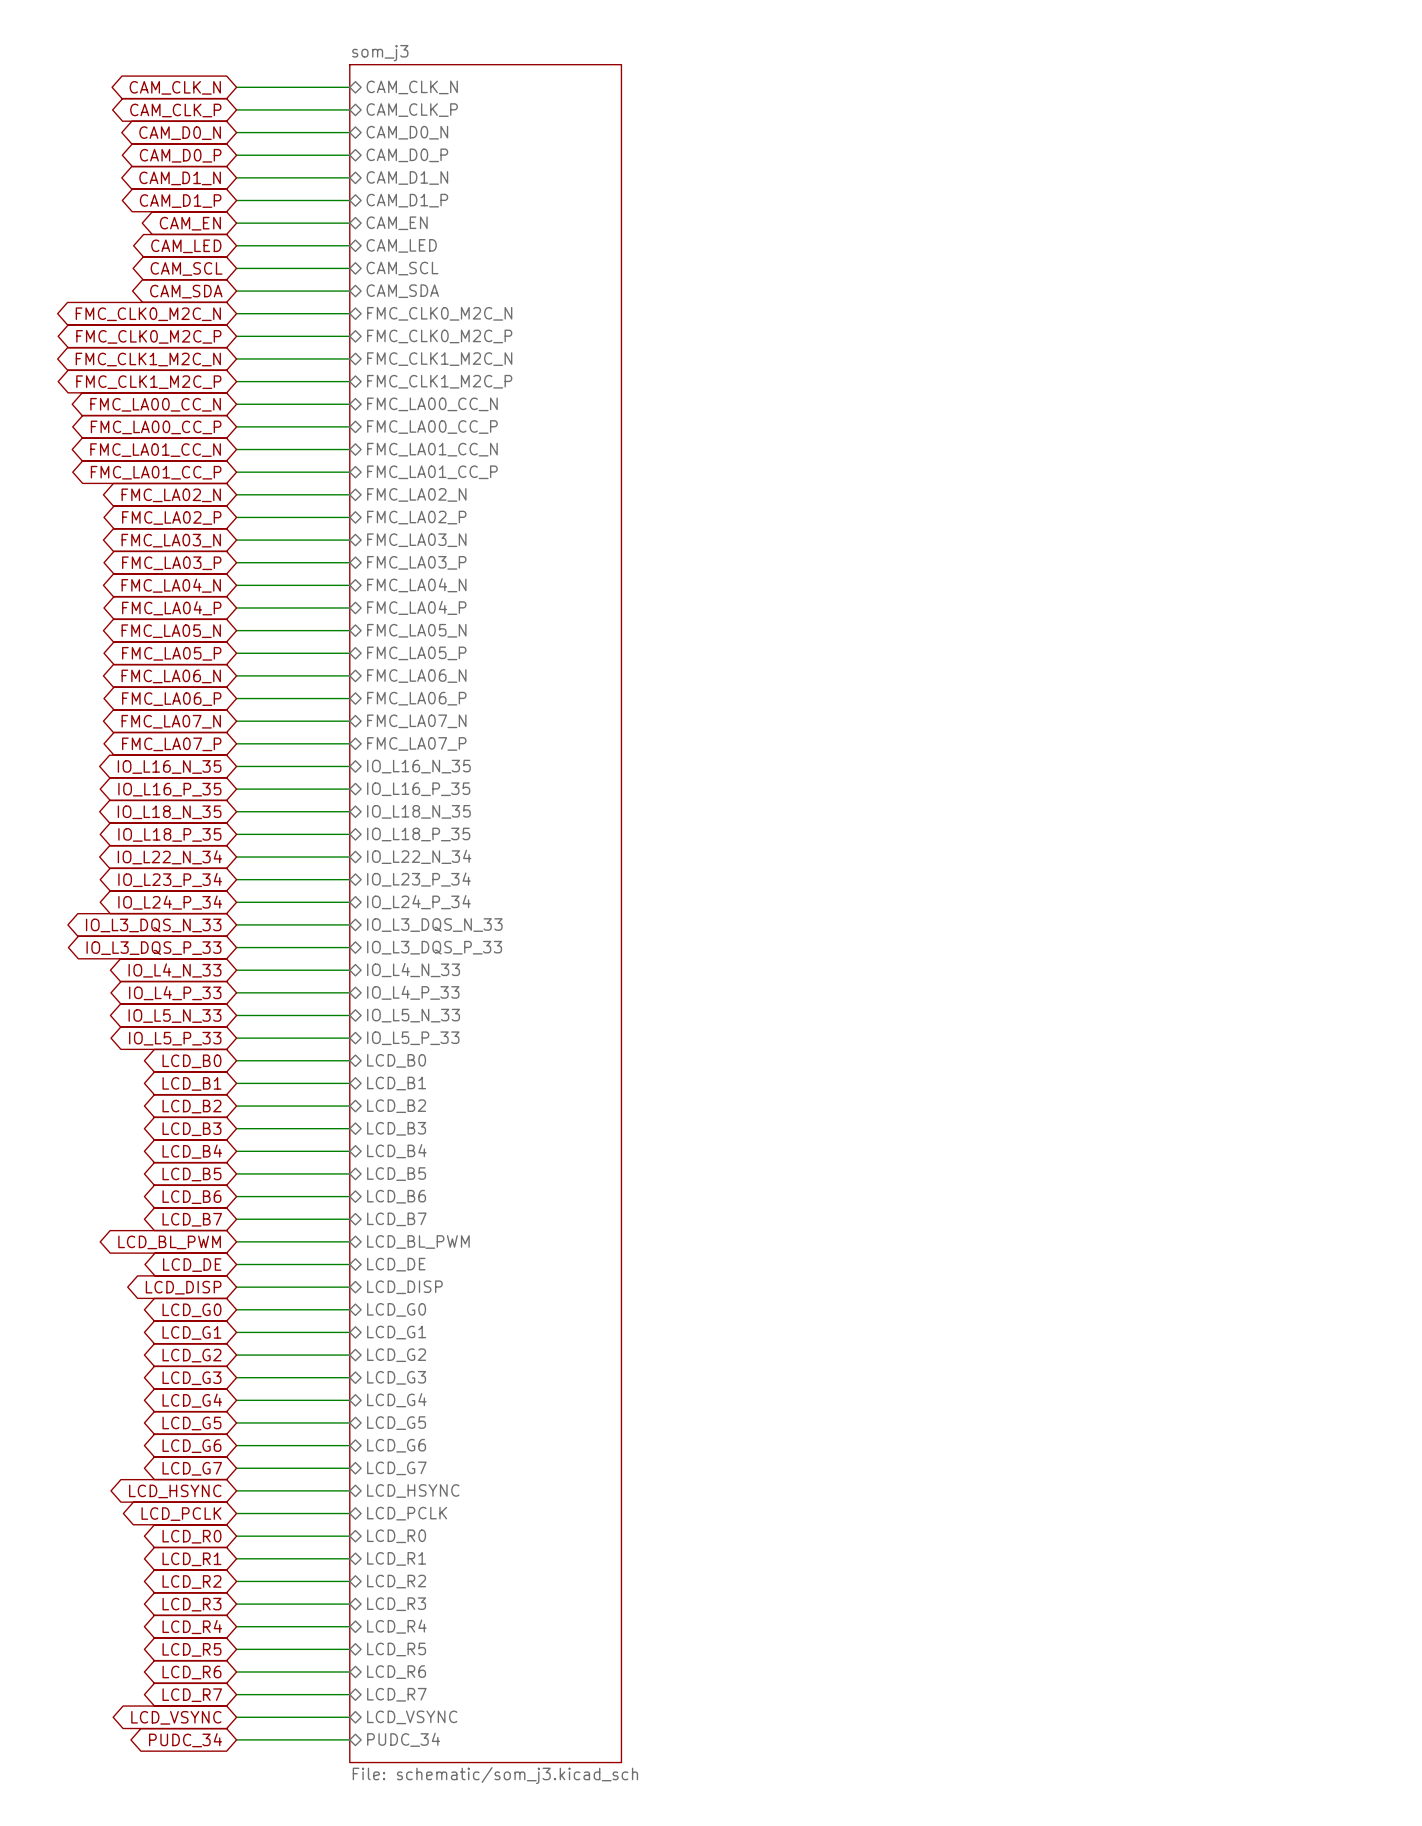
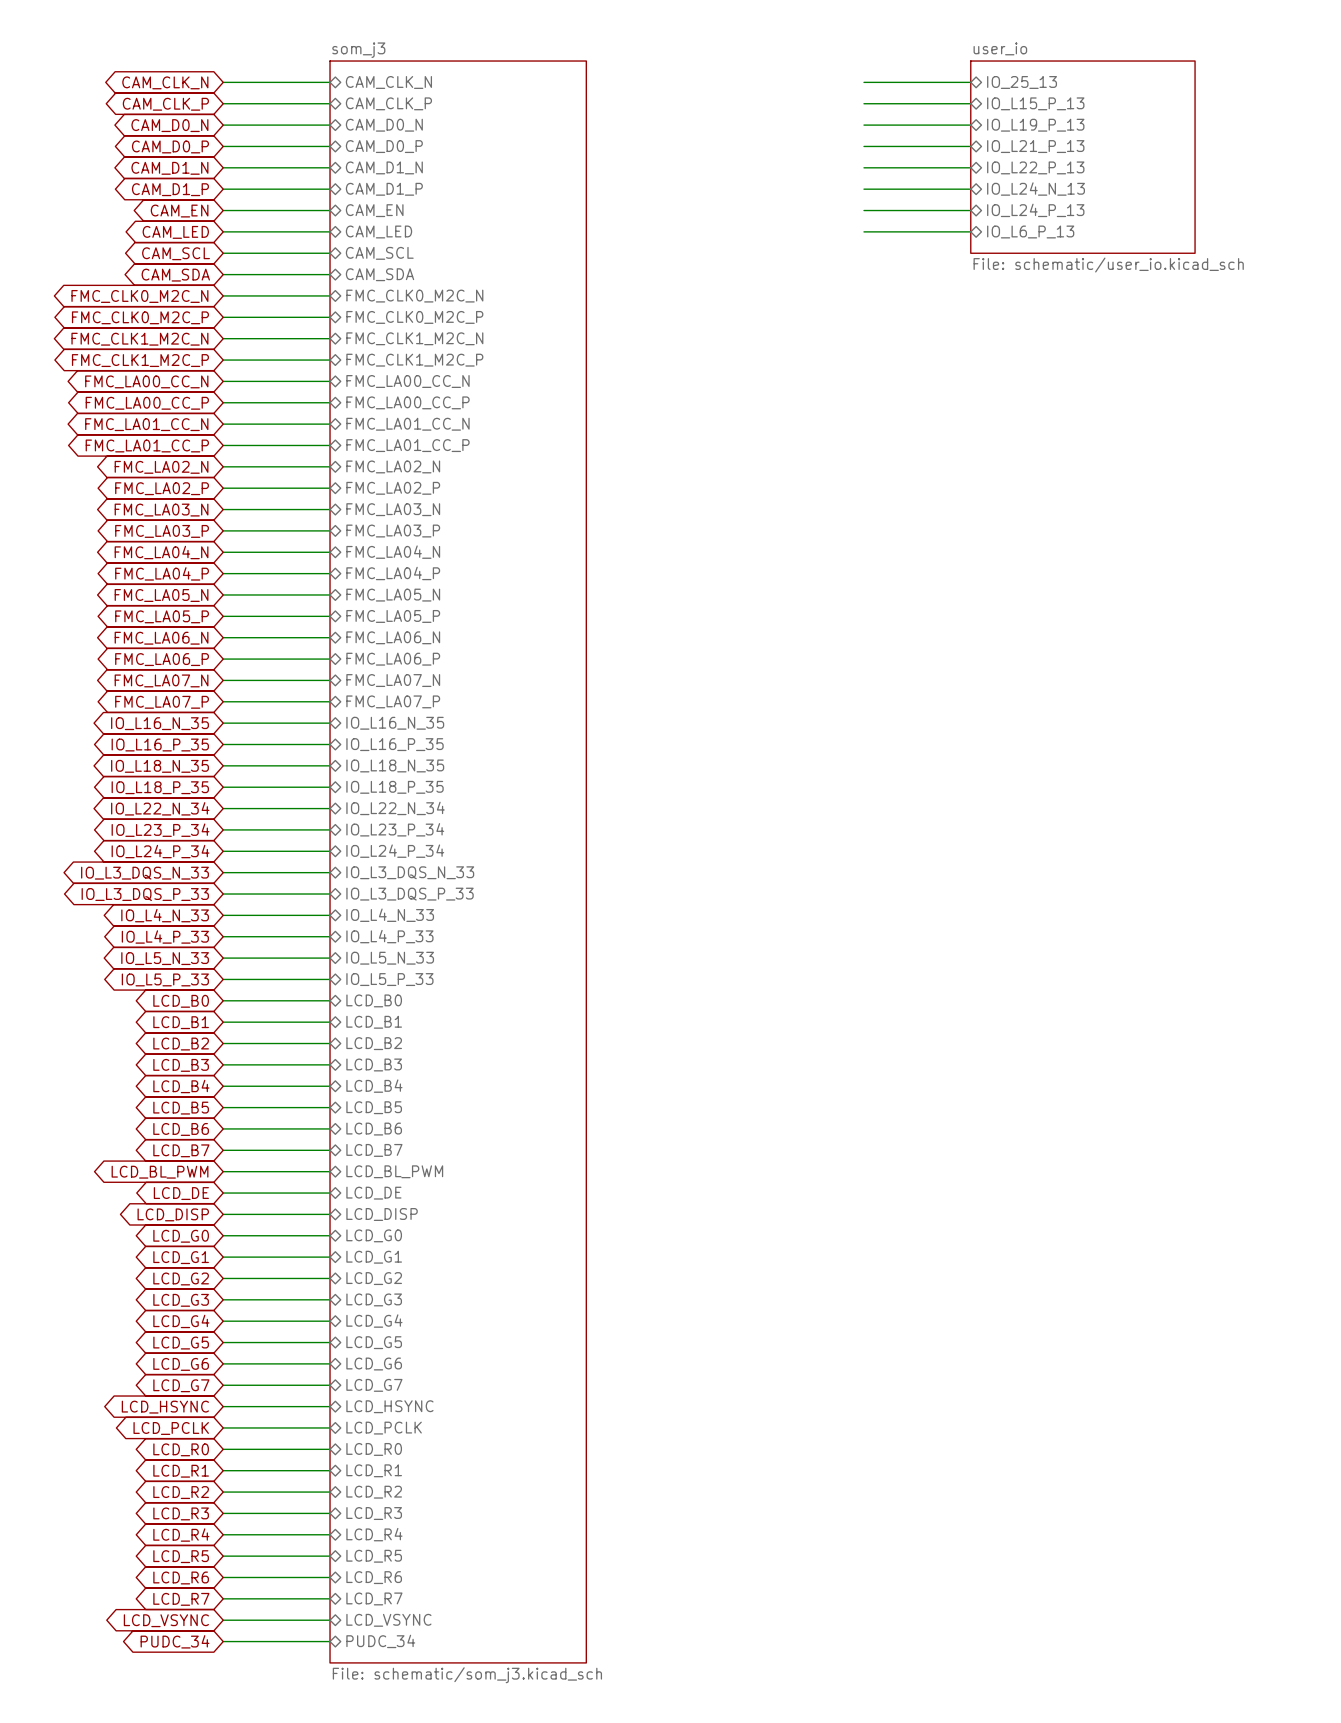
wire: none -> (863, 82) (970, 82)
sheet pin: none -> IO_25_13 (1022, 82)
wire: none -> (863, 103) (970, 103)
sheet pin: none -> IO_L15_P_13 (1035, 103)
wire: none -> (863, 125) (970, 125)
sheet pin: none -> IO_L19_P_13 (1035, 125)
wire: none -> (863, 146) (970, 146)
sheet pin: none -> IO_L21_P_13 (1035, 146)
sheet user_io: none -> File: schematic/user_io.kicad_sch (1082, 157)
wire: none -> (863, 167) (970, 167)
sheet pin: none -> IO_L22_P_13 (1035, 167)
wire: none -> (863, 189) (970, 189)
sheet pin: none -> IO_L24_N_13 (1036, 189)
sheet pin: none -> IO_L24_P_13 (1035, 210)
wire: none -> (863, 210) (970, 210)
wire: none -> (863, 231) (970, 231)
sheet pin: none -> IO_L6_P_13 (1030, 231)

